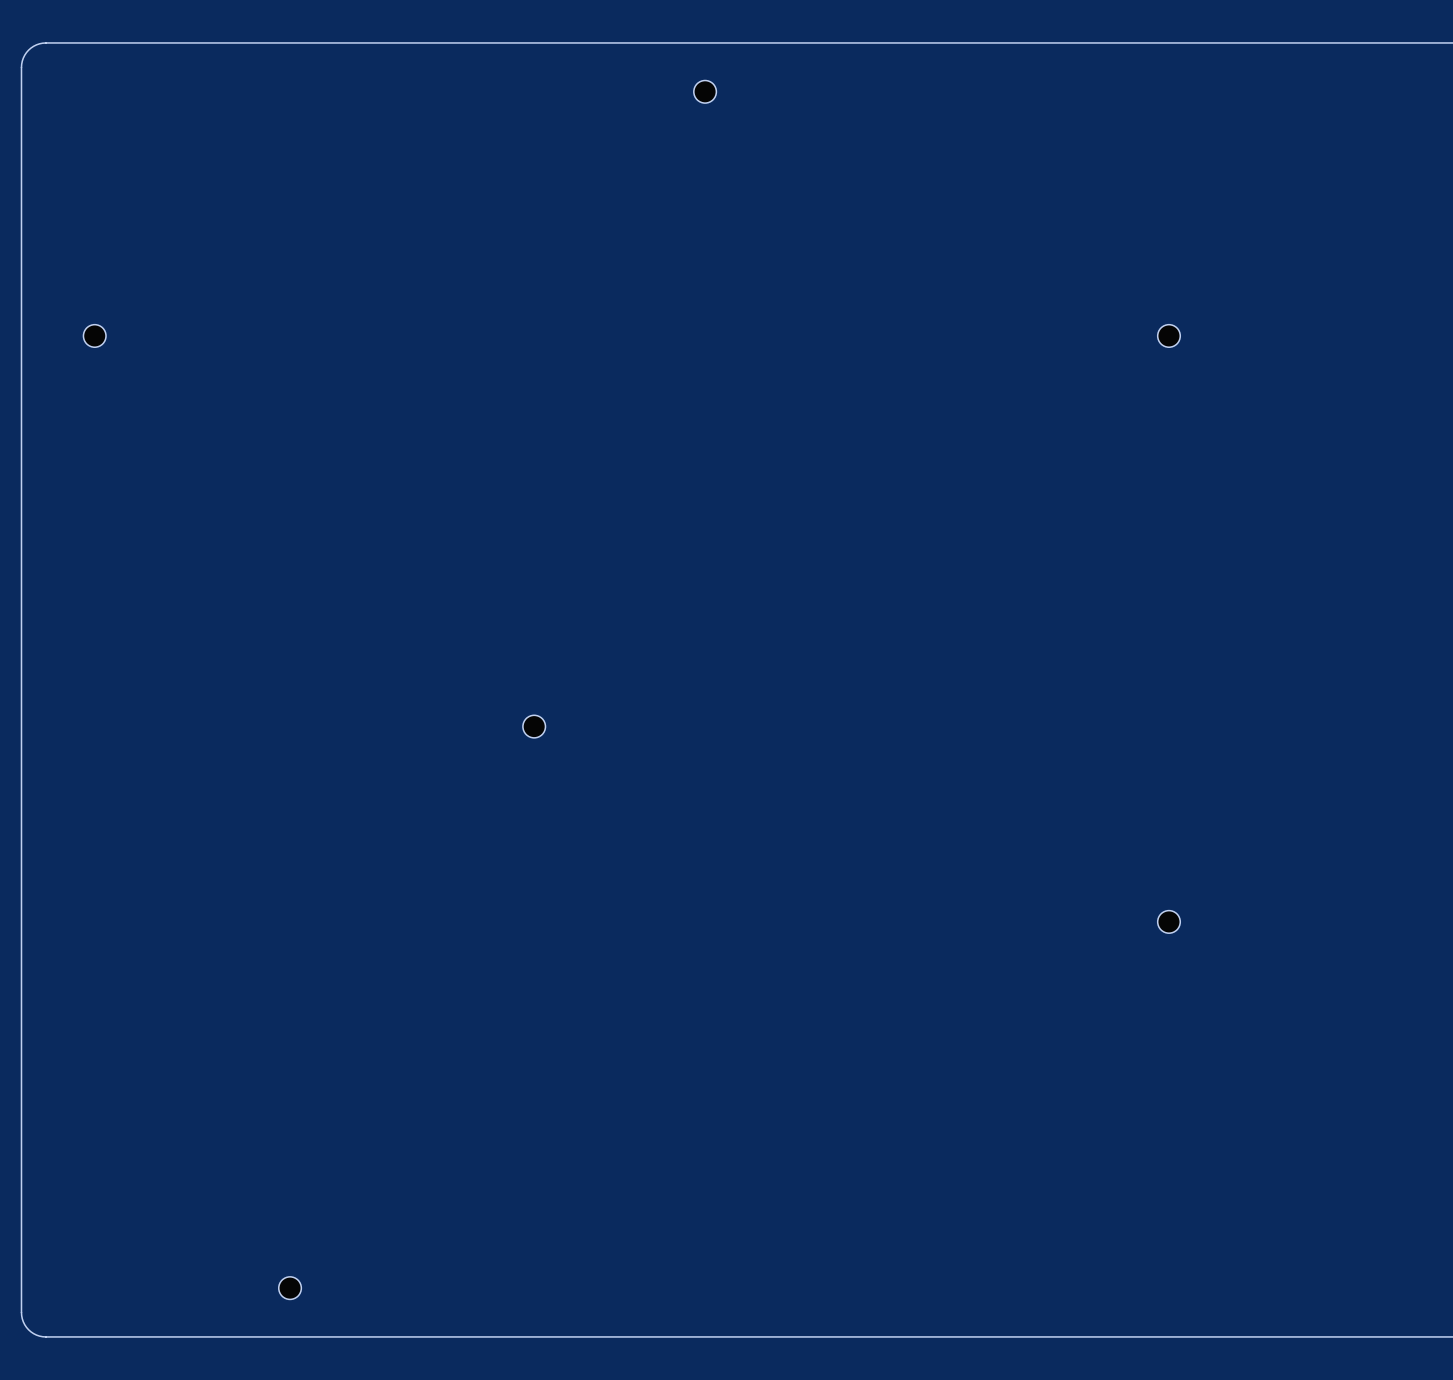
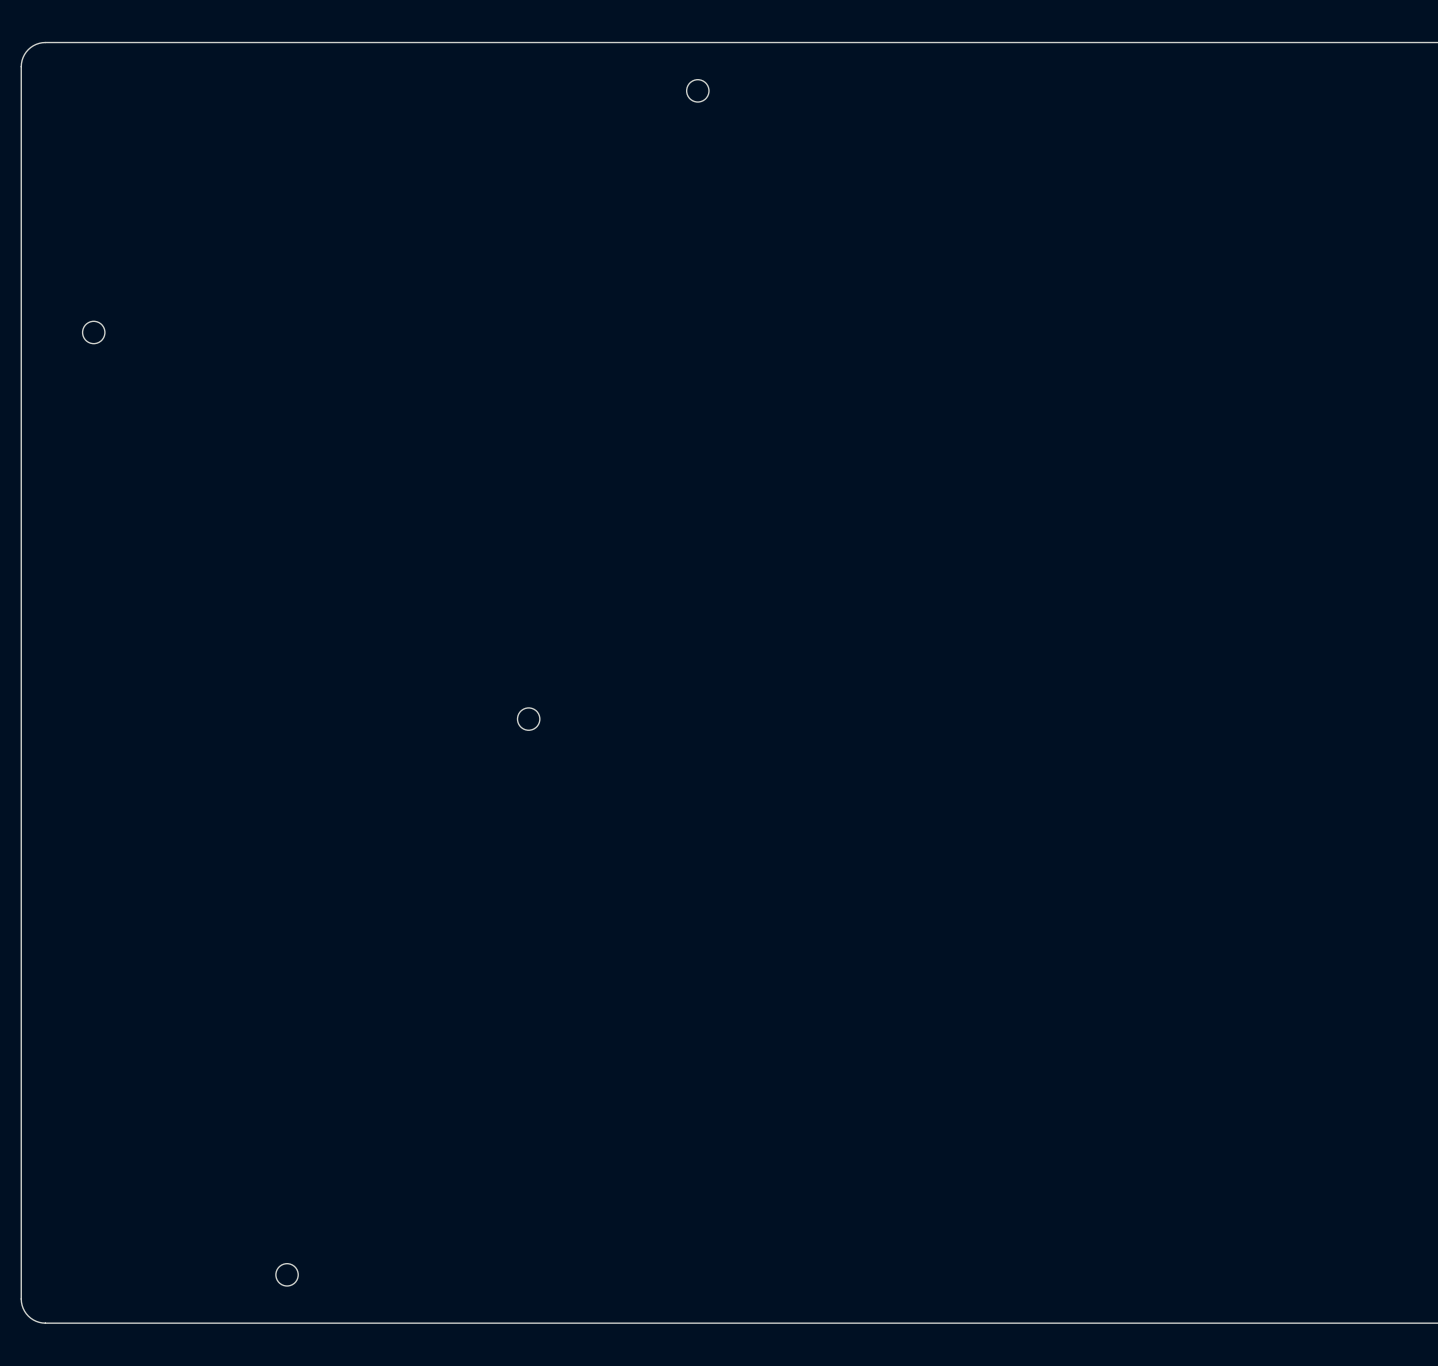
part: (1168, 335) -> none
part: (1168, 921) -> none

